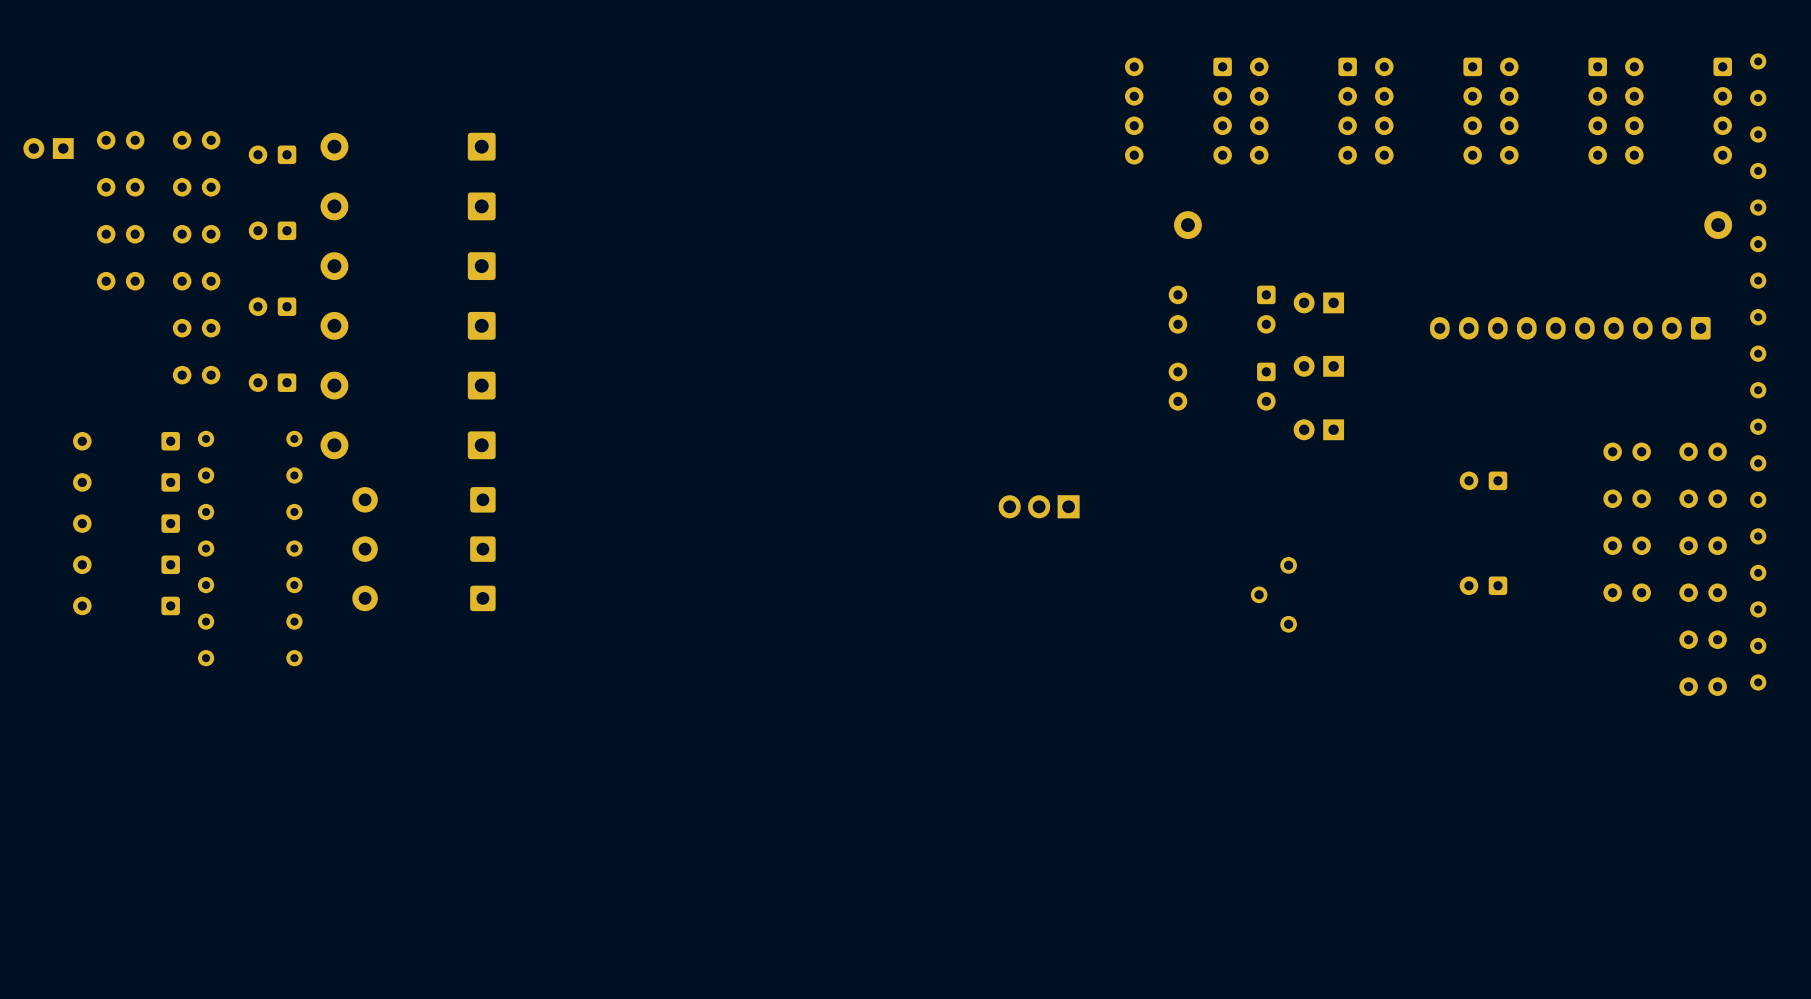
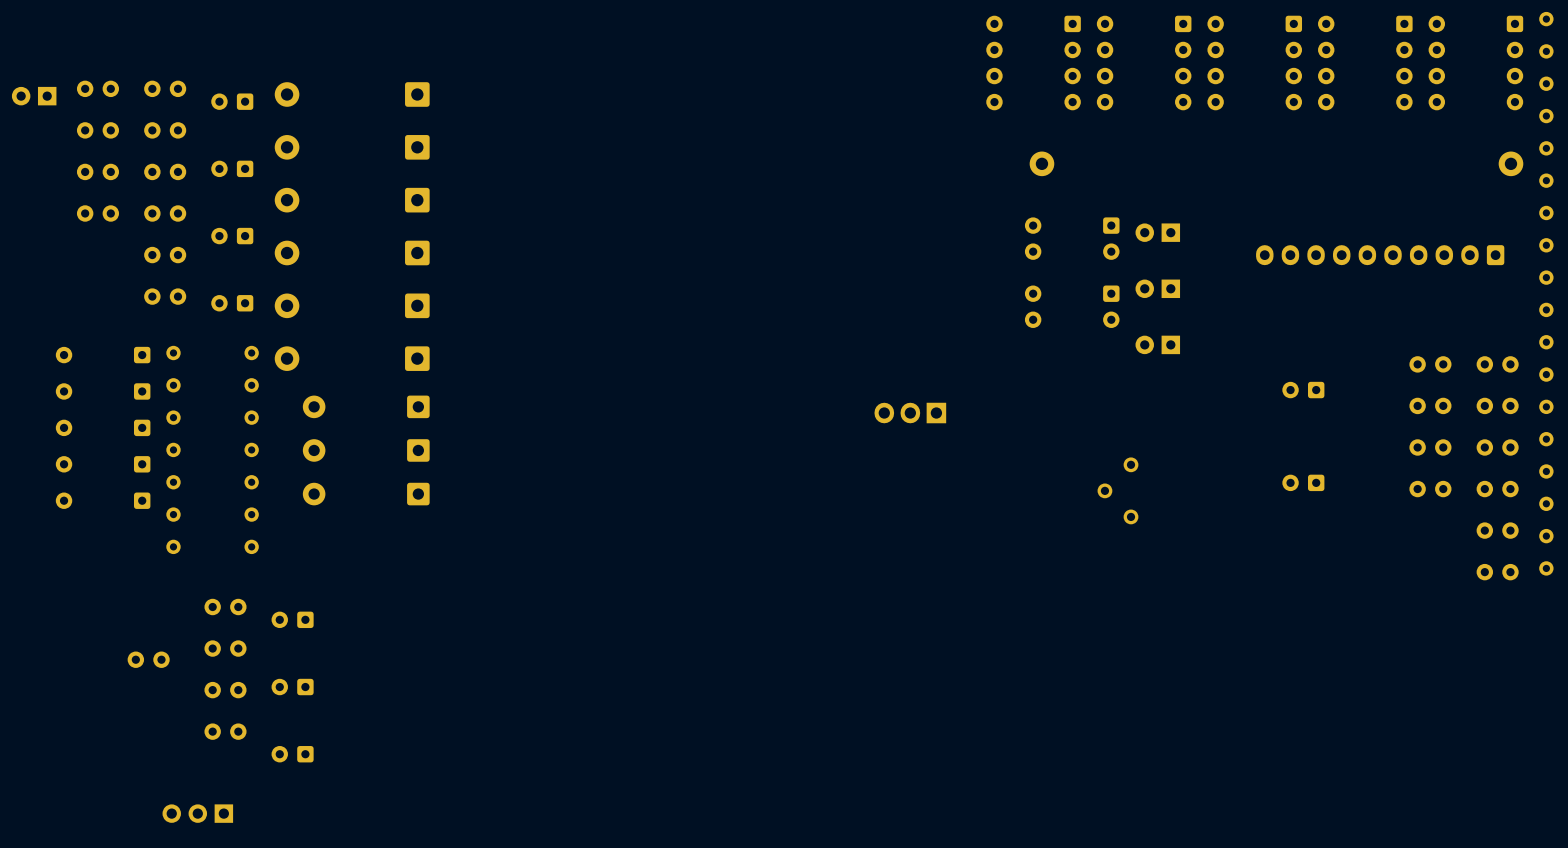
part: none -> (225, 607)
part: none -> (292, 619)
part: none -> (225, 648)
part: none -> (148, 659)
part: none -> (292, 687)
part: none -> (225, 690)
part: none -> (225, 731)
part: none -> (292, 754)
part: none -> (197, 813)

